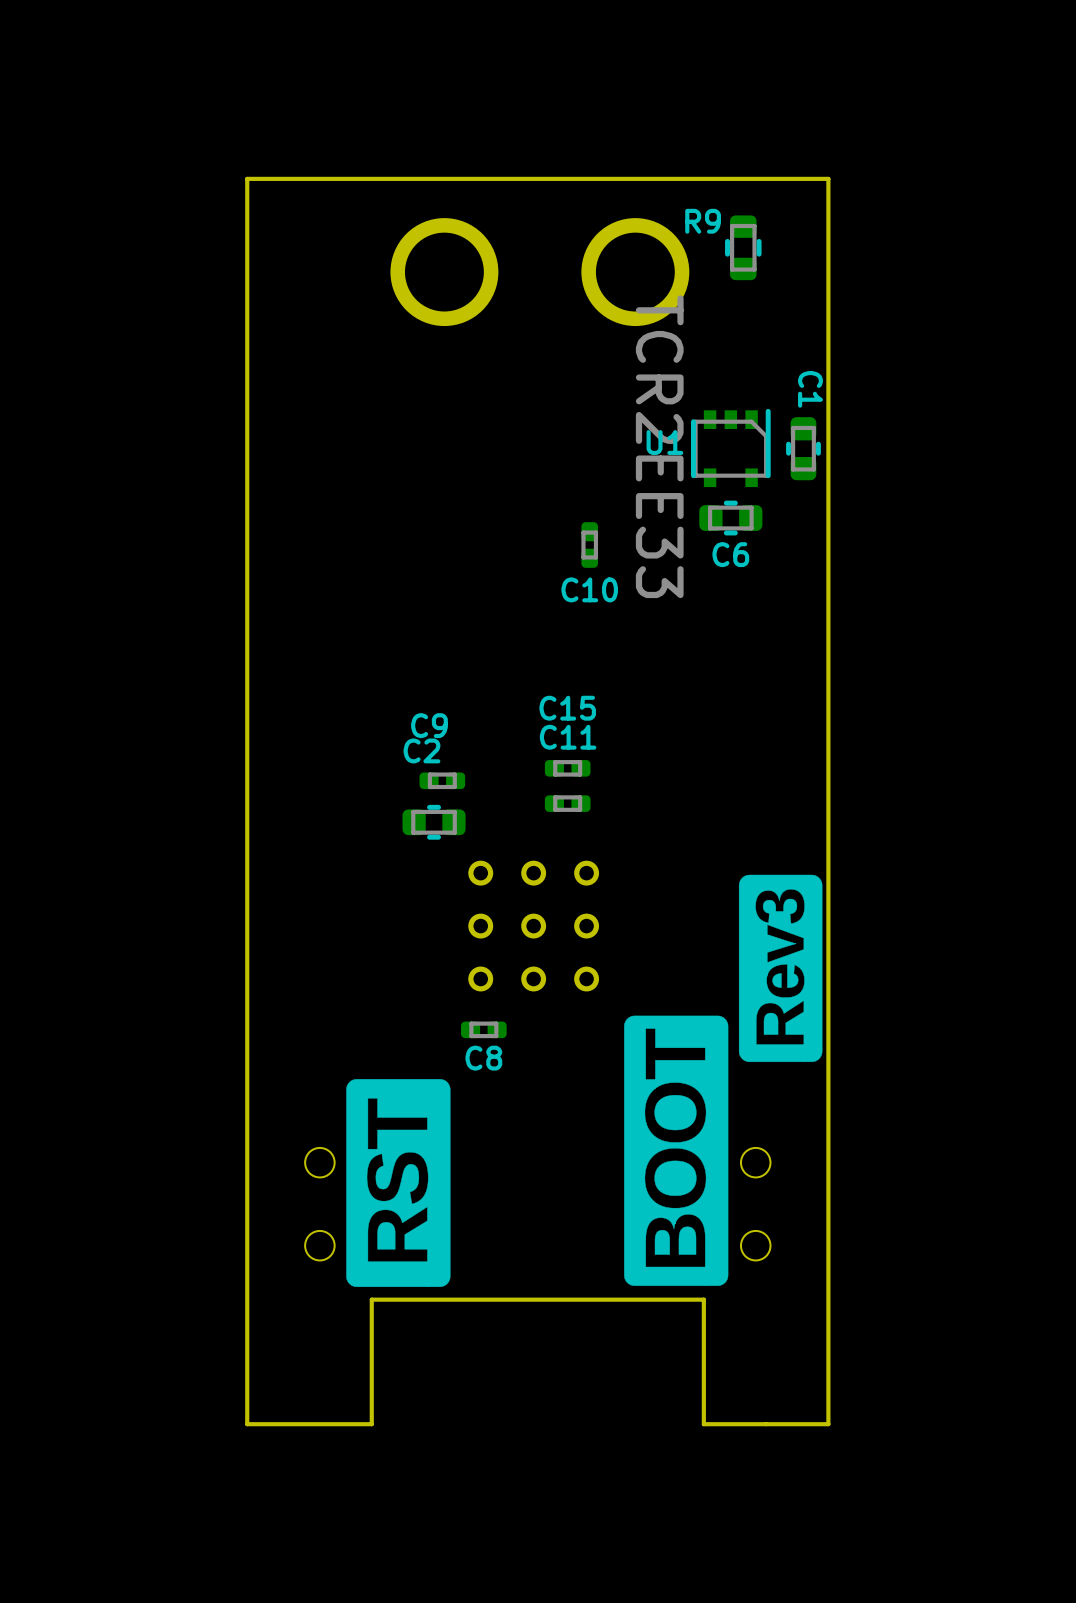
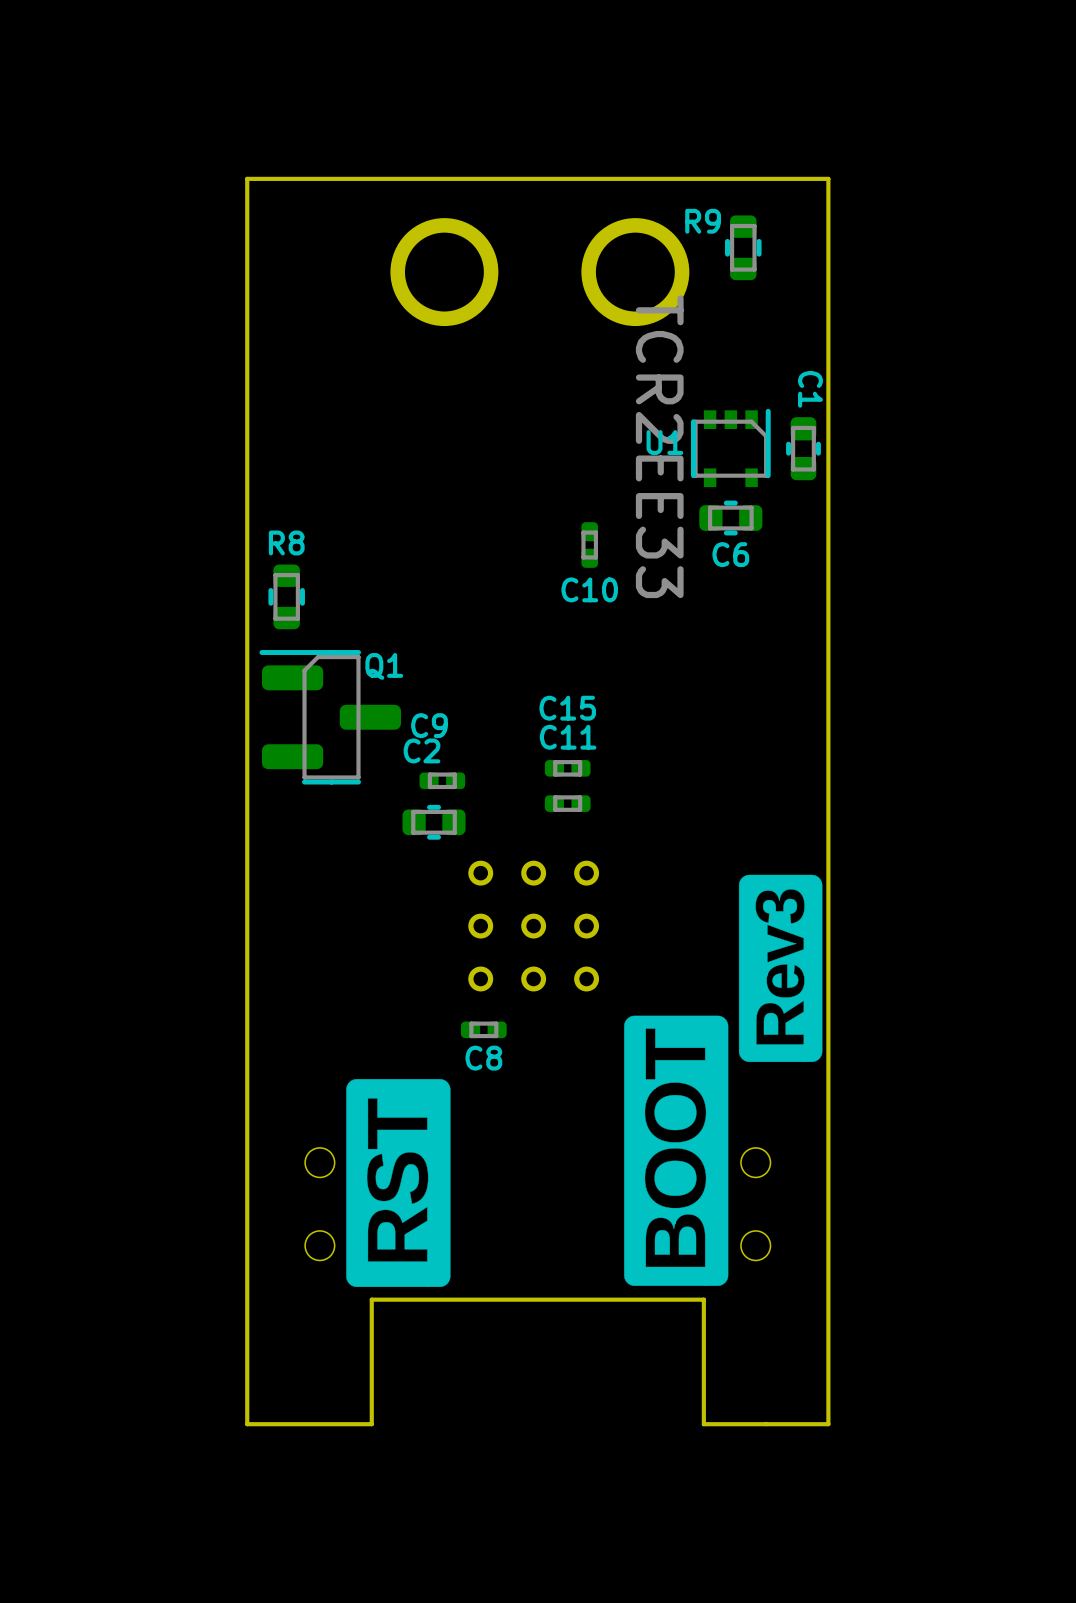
R8: none -> (286, 596)
Q1: none -> (330, 717)

